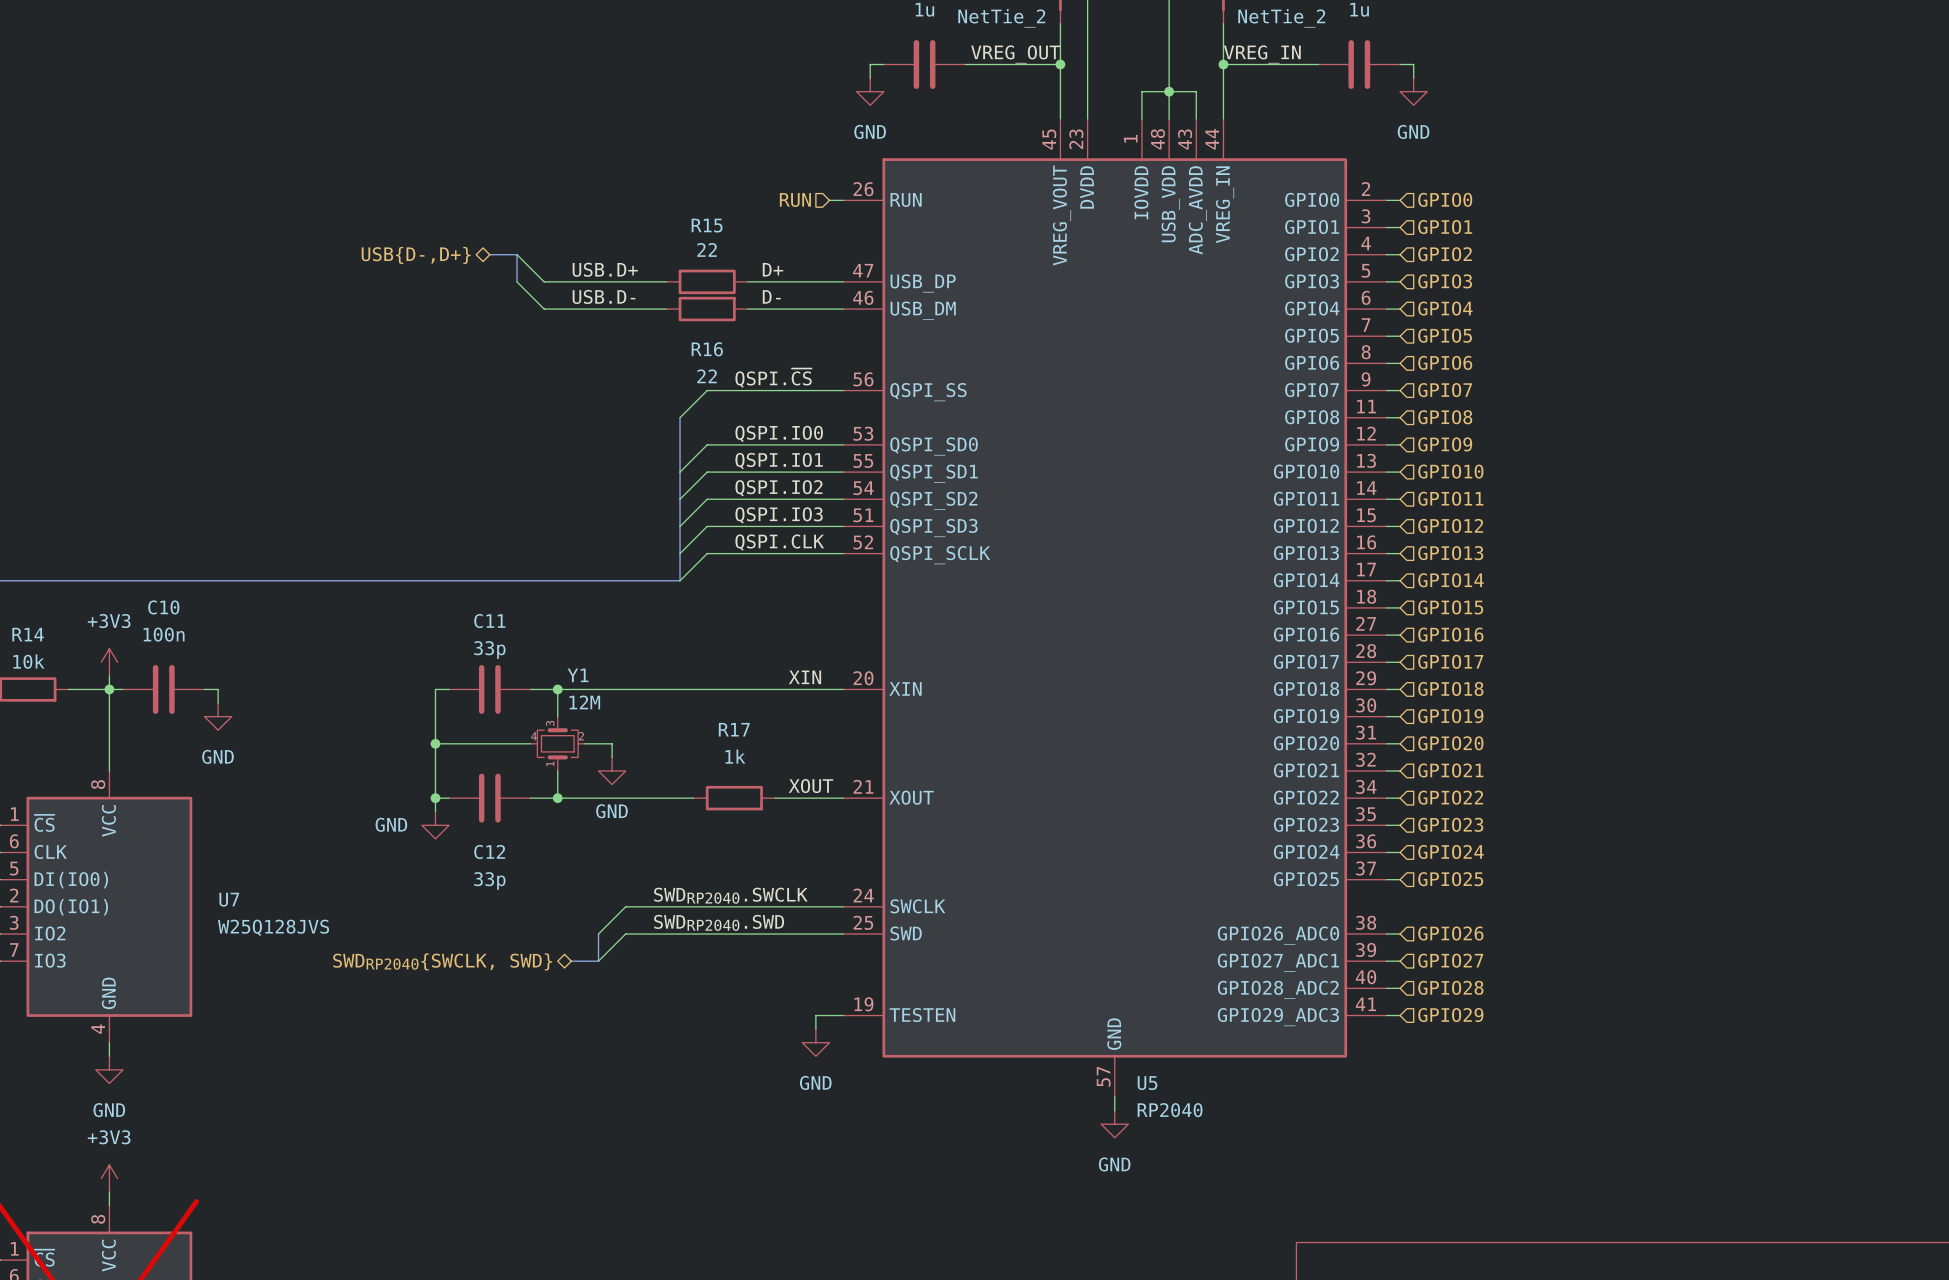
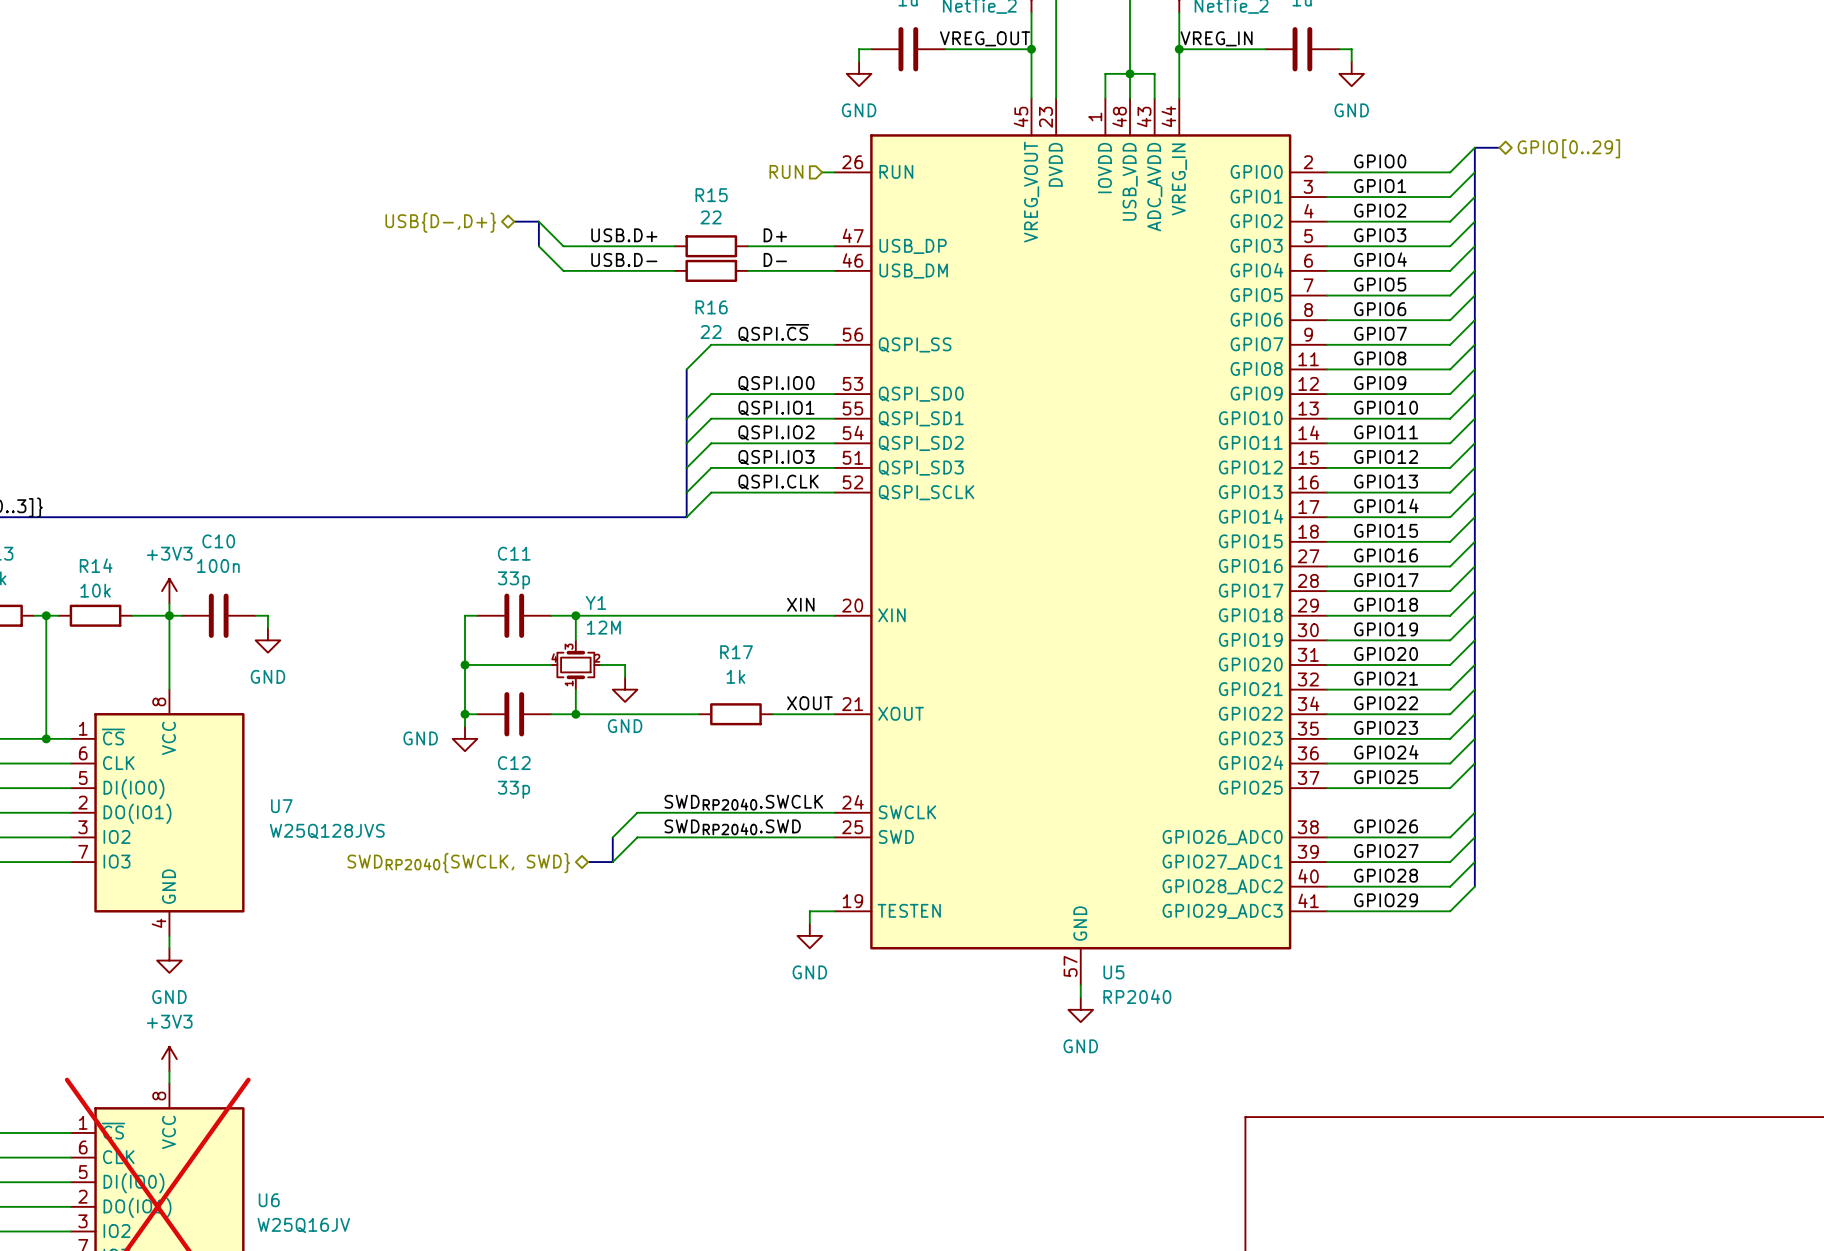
wire: none -> (1474, 147) (1450, 172) (1339, 172)
bus: none -> (1499, 147) (1474, 147) (1474, 886)
hierarchical label: none -> GPIO[0..29] (1568, 148)
label: none -> GPIO0 (1380, 161)
hierarchical label: GPIO0 (1445, 199) -> none
wire: none -> (1474, 172) (1450, 197) (1339, 197)
label: none -> GPIO1 (1380, 186)
hierarchical label: GPIO1 (1445, 227) -> none
wire: none -> (1474, 197) (1450, 221) (1339, 221)
label: none -> GPIO2 (1380, 210)
hierarchical label: GPIO2 (1445, 254) -> none
wire: none -> (1474, 221) (1450, 246) (1339, 246)
label: none -> GPIO3 (1380, 235)
hierarchical label: GPIO3 (1445, 281) -> none
wire: none -> (1474, 246) (1450, 270) (1339, 270)
label: none -> GPIO4 (1380, 259)
hierarchical label: GPIO4 (1445, 308) -> none
wire: none -> (1474, 270) (1450, 295) (1339, 295)
label: none -> GPIO5 (1380, 284)
hierarchical label: GPIO5 (1445, 335) -> none
wire: none -> (1474, 295) (1450, 320) (1339, 320)
label: none -> GPIO6 (1380, 309)
hierarchical label: GPIO6 (1445, 362) -> none
wire: none -> (1474, 320) (1450, 344) (1339, 344)
label: none -> GPIO7 (1380, 333)
hierarchical label: GPIO7 (1445, 390) -> none
wire: none -> (1474, 344) (1450, 369) (1339, 369)
label: none -> GPIO8 (1380, 358)
hierarchical label: GPIO8 (1445, 417) -> none
wire: none -> (1474, 369) (1450, 394) (1339, 394)
label: none -> GPIO9 (1380, 383)
hierarchical label: GPIO9 (1445, 444) -> none
wire: none -> (1474, 394) (1450, 418) (1339, 418)
label: none -> GPIO10 (1386, 407)
hierarchical label: GPIO10 (1450, 471) -> none
wire: none -> (1474, 418) (1450, 443) (1339, 443)
label: none -> GPIO11 (1386, 432)
hierarchical label: GPIO11 (1450, 498) -> none
wire: none -> (1474, 443) (1450, 467) (1339, 467)
label: none -> GPIO12 (1386, 456)
hierarchical label: GPIO12 (1450, 525) -> none
wire: none -> (1474, 467) (1450, 492) (1339, 492)
label: none -> GPIO13 (1386, 481)
hierarchical label: GPIO13 (1450, 553) -> none
wire: none -> (1474, 492) (1450, 517) (1339, 517)
label: none -> GPIO14 (1386, 505)
hierarchical label: GPIO14 (1451, 580) -> none
wire: none -> (1474, 517) (1450, 541) (1339, 541)
label: none -> GPIO15 (1386, 530)
hierarchical label: GPIO15 (1450, 607) -> none
wire: none -> (1474, 541) (1450, 566) (1339, 566)
label: none -> GPIO16 (1386, 555)
hierarchical label: GPIO16 (1450, 634) -> none
wire: none -> (1474, 566) (1450, 591) (1339, 591)
label: none -> GPIO17 (1386, 580)
hierarchical label: GPIO17 (1450, 661) -> none
wire: none -> (1474, 591) (1450, 615) (1339, 615)
label: none -> GPIO18 (1386, 604)
hierarchical label: GPIO18 (1450, 688) -> none
wire: none -> (1474, 615) (1450, 640) (1339, 640)
label: none -> GPIO19 (1386, 629)
hierarchical label: GPIO19 (1450, 716) -> none
wire: none -> (1474, 640) (1450, 665) (1339, 665)
label: none -> GPIO20 (1386, 654)
hierarchical label: GPIO20 (1450, 743) -> none
wire: none -> (1474, 665) (1450, 689) (1339, 689)
label: none -> GPIO21 (1386, 678)
hierarchical label: GPIO21 (1450, 770) -> none
wire: none -> (1474, 689) (1450, 714) (1339, 714)
label: none -> GPIO22 (1386, 703)
hierarchical label: GPIO22 (1450, 797) -> none
wire: none -> (1474, 714) (1450, 738) (1339, 738)
label: none -> GPIO23 (1386, 727)
hierarchical label: GPIO23 (1450, 824) -> none
wire: none -> (1474, 738) (1450, 763) (1339, 763)
label: none -> GPIO24 (1386, 752)
hierarchical label: GPIO24 (1451, 851) -> none
wire: none -> (1474, 763) (1450, 788) (1339, 788)
label: none -> GPIO25 (1386, 777)
hierarchical label: GPIO25 (1450, 879) -> none
wire: none -> (1474, 812) (1450, 837) (1339, 837)
label: none -> GPIO26 (1386, 826)
hierarchical label: GPIO26 (1450, 933) -> none
wire: none -> (1474, 837) (1450, 862) (1339, 862)
label: none -> GPIO27 (1386, 851)
hierarchical label: GPIO27 (1450, 960) -> none
wire: none -> (1474, 862) (1450, 886) (1339, 886)
label: none -> GPIO28 (1386, 875)
hierarchical label: GPIO28 (1450, 987) -> none
wire: none -> (1474, 886) (1450, 911) (1339, 911)
label: none -> GPIO29 (1386, 900)
hierarchical label: GPIO29 (1450, 1015) -> none

